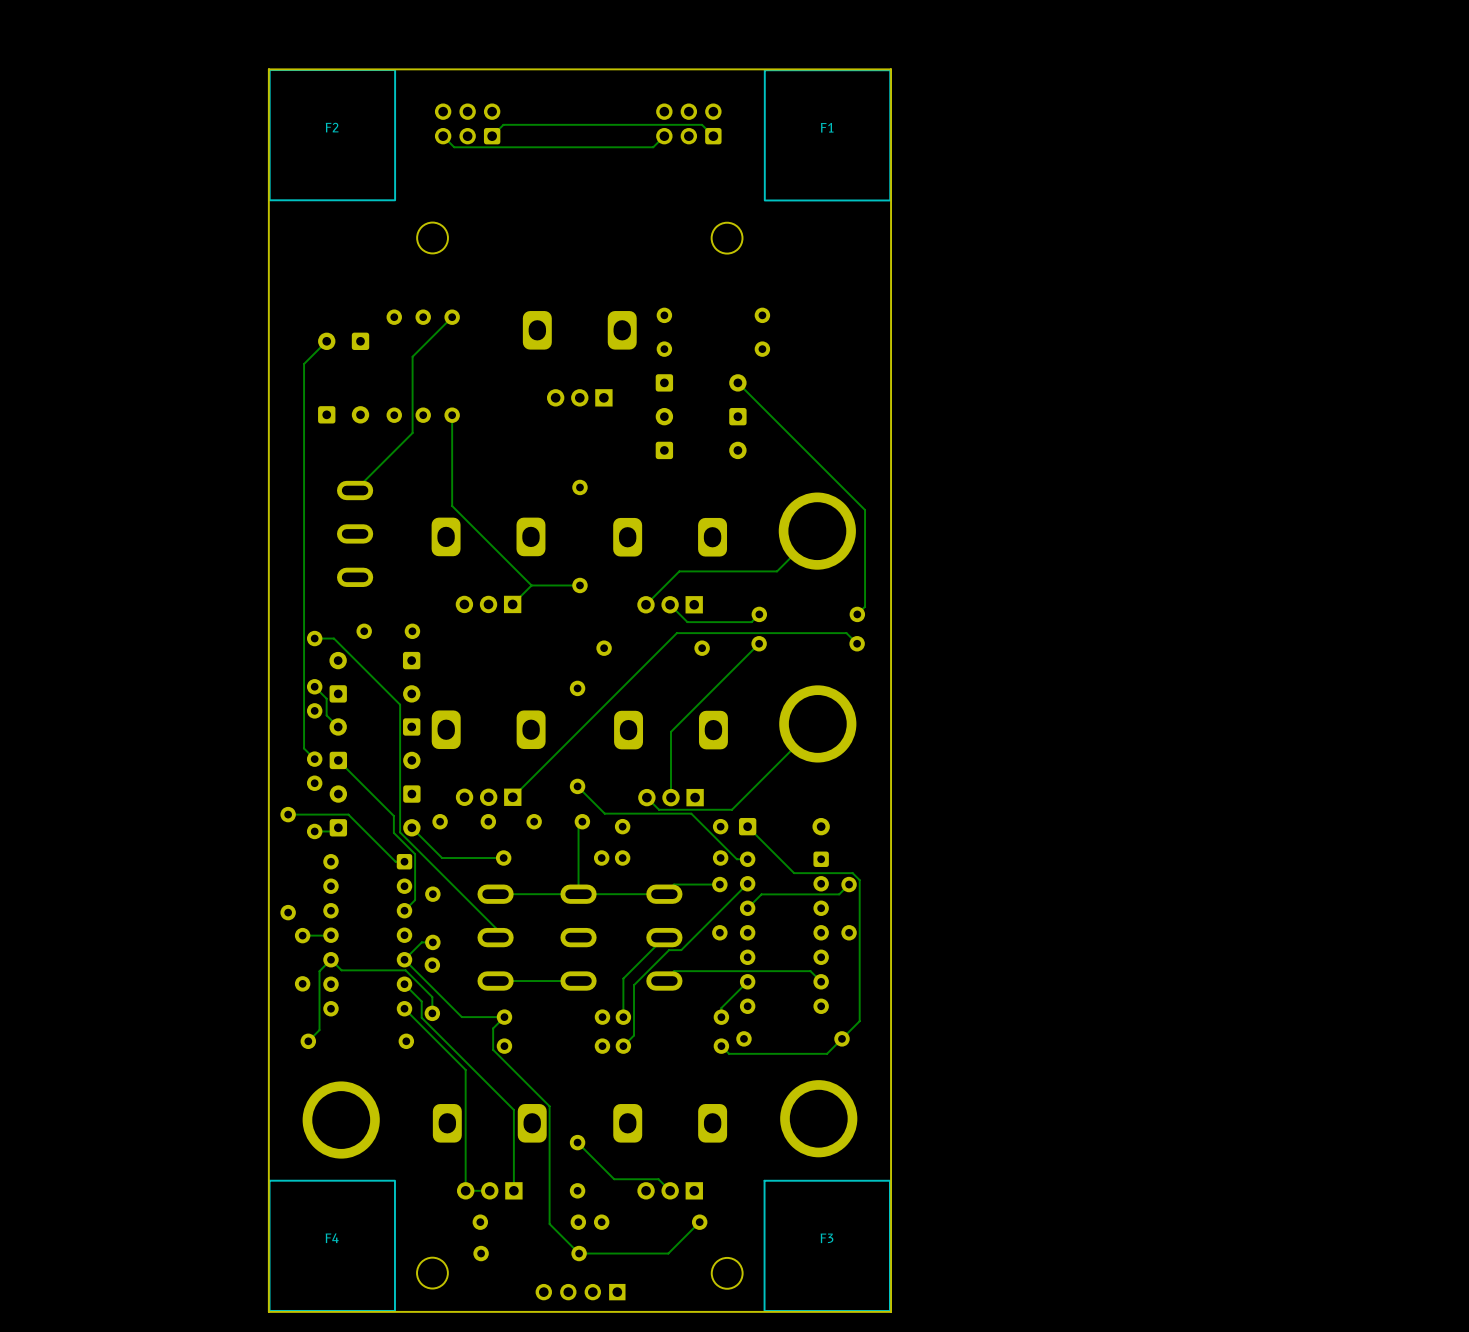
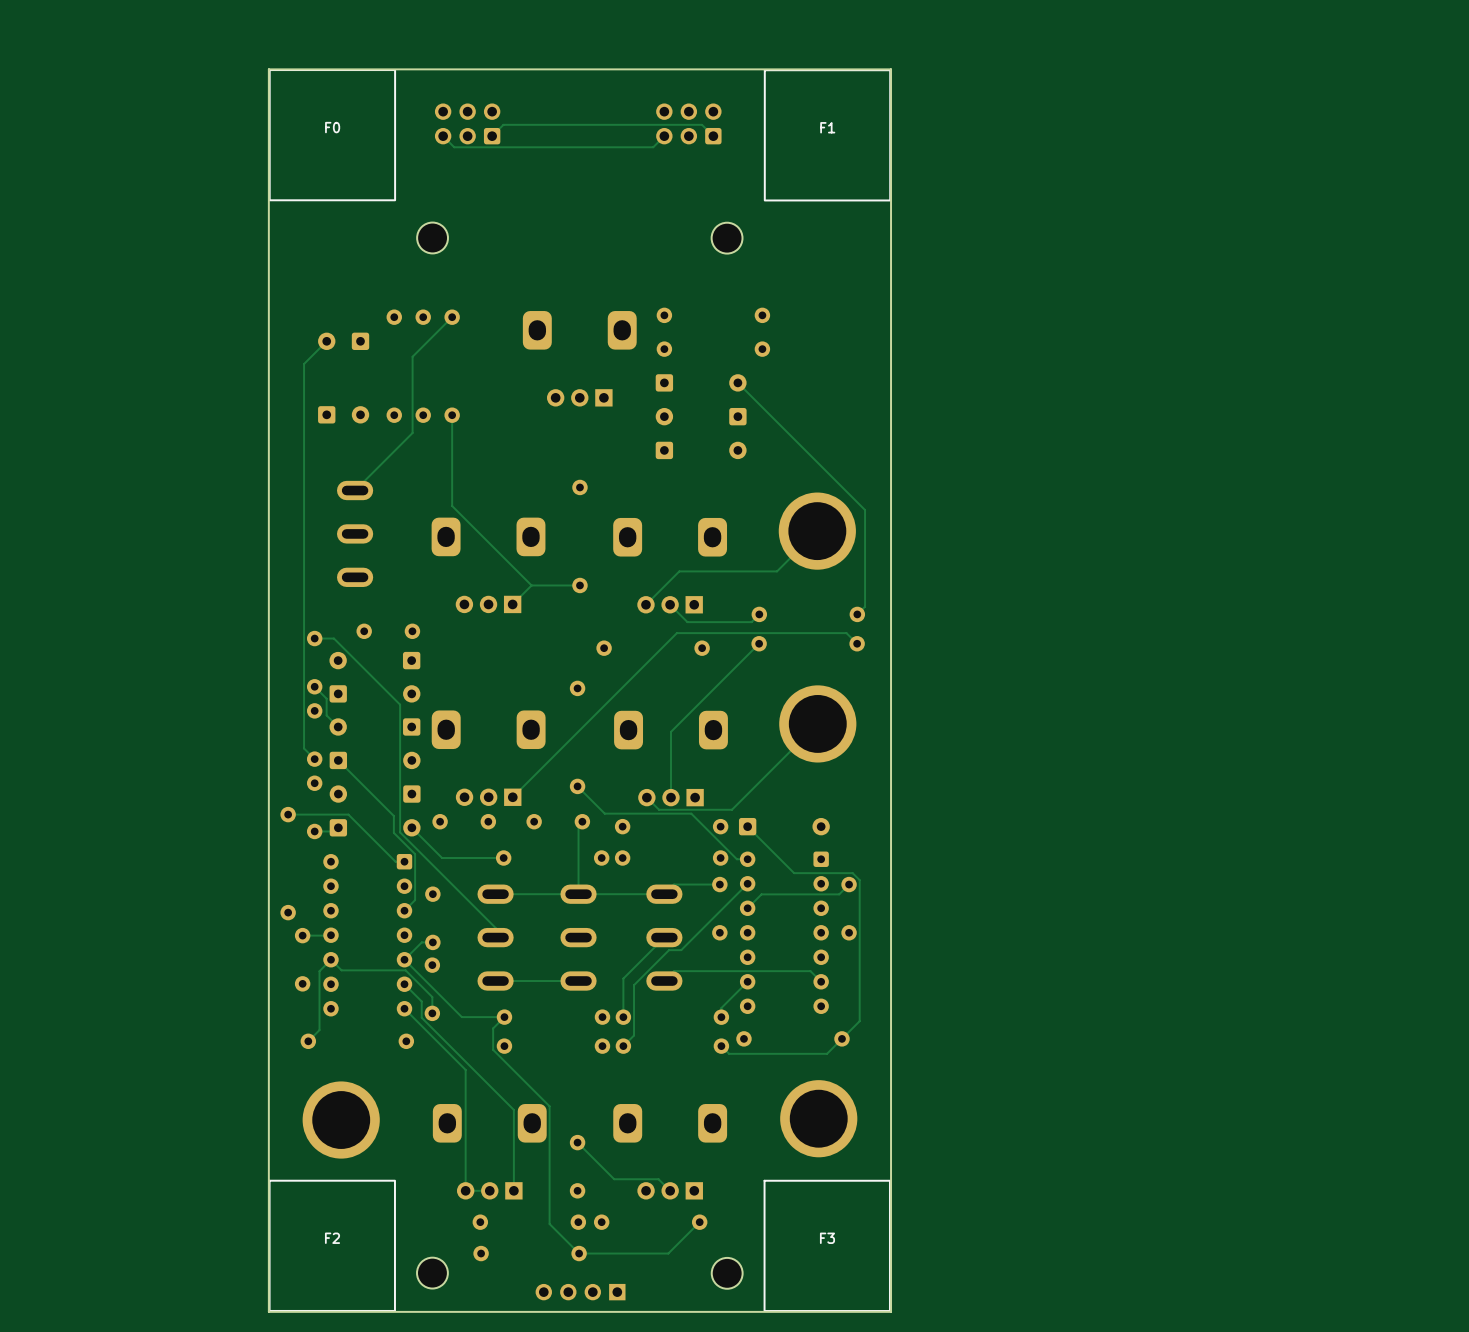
F2 name: F2 (332, 127) -> F0 (332, 127)
F4 name: F4 (332, 1238) -> F2 (332, 1238)

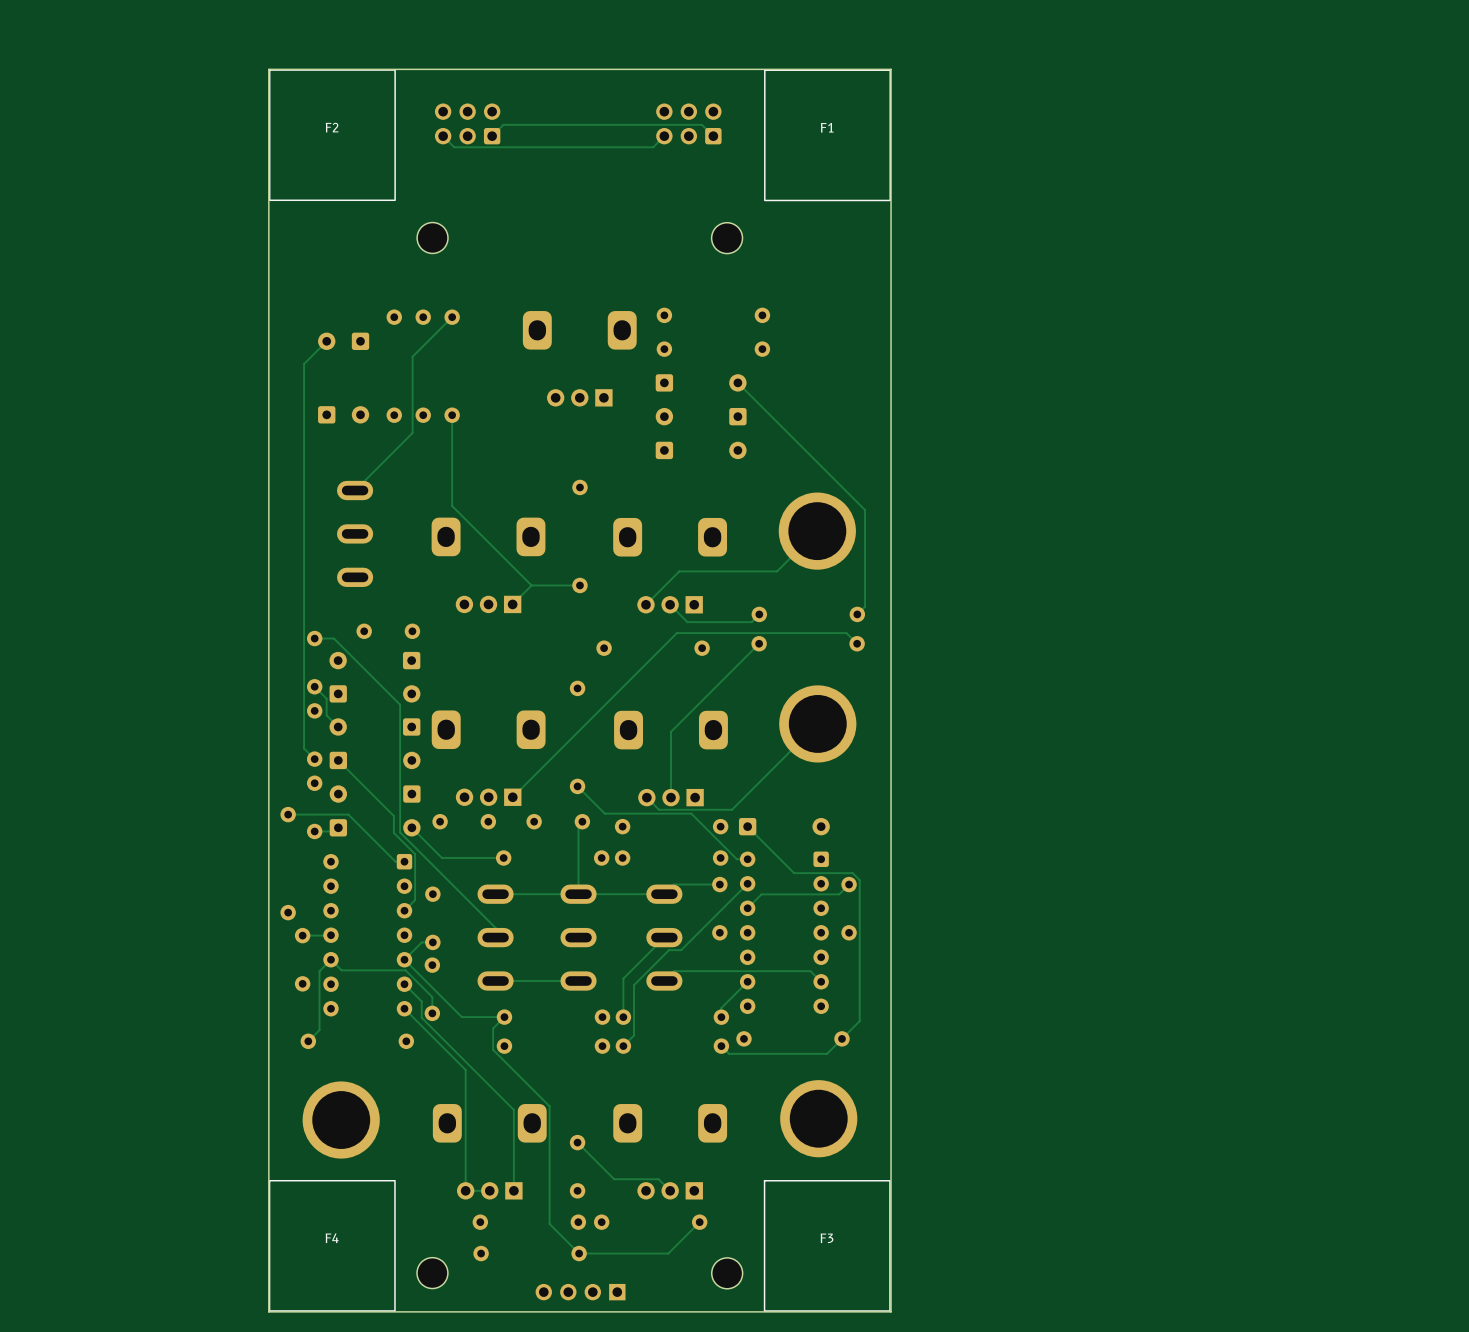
F0 name: F0 (332, 127) -> F2 (332, 127)
F2 name: F2 (332, 1238) -> F4 (332, 1238)

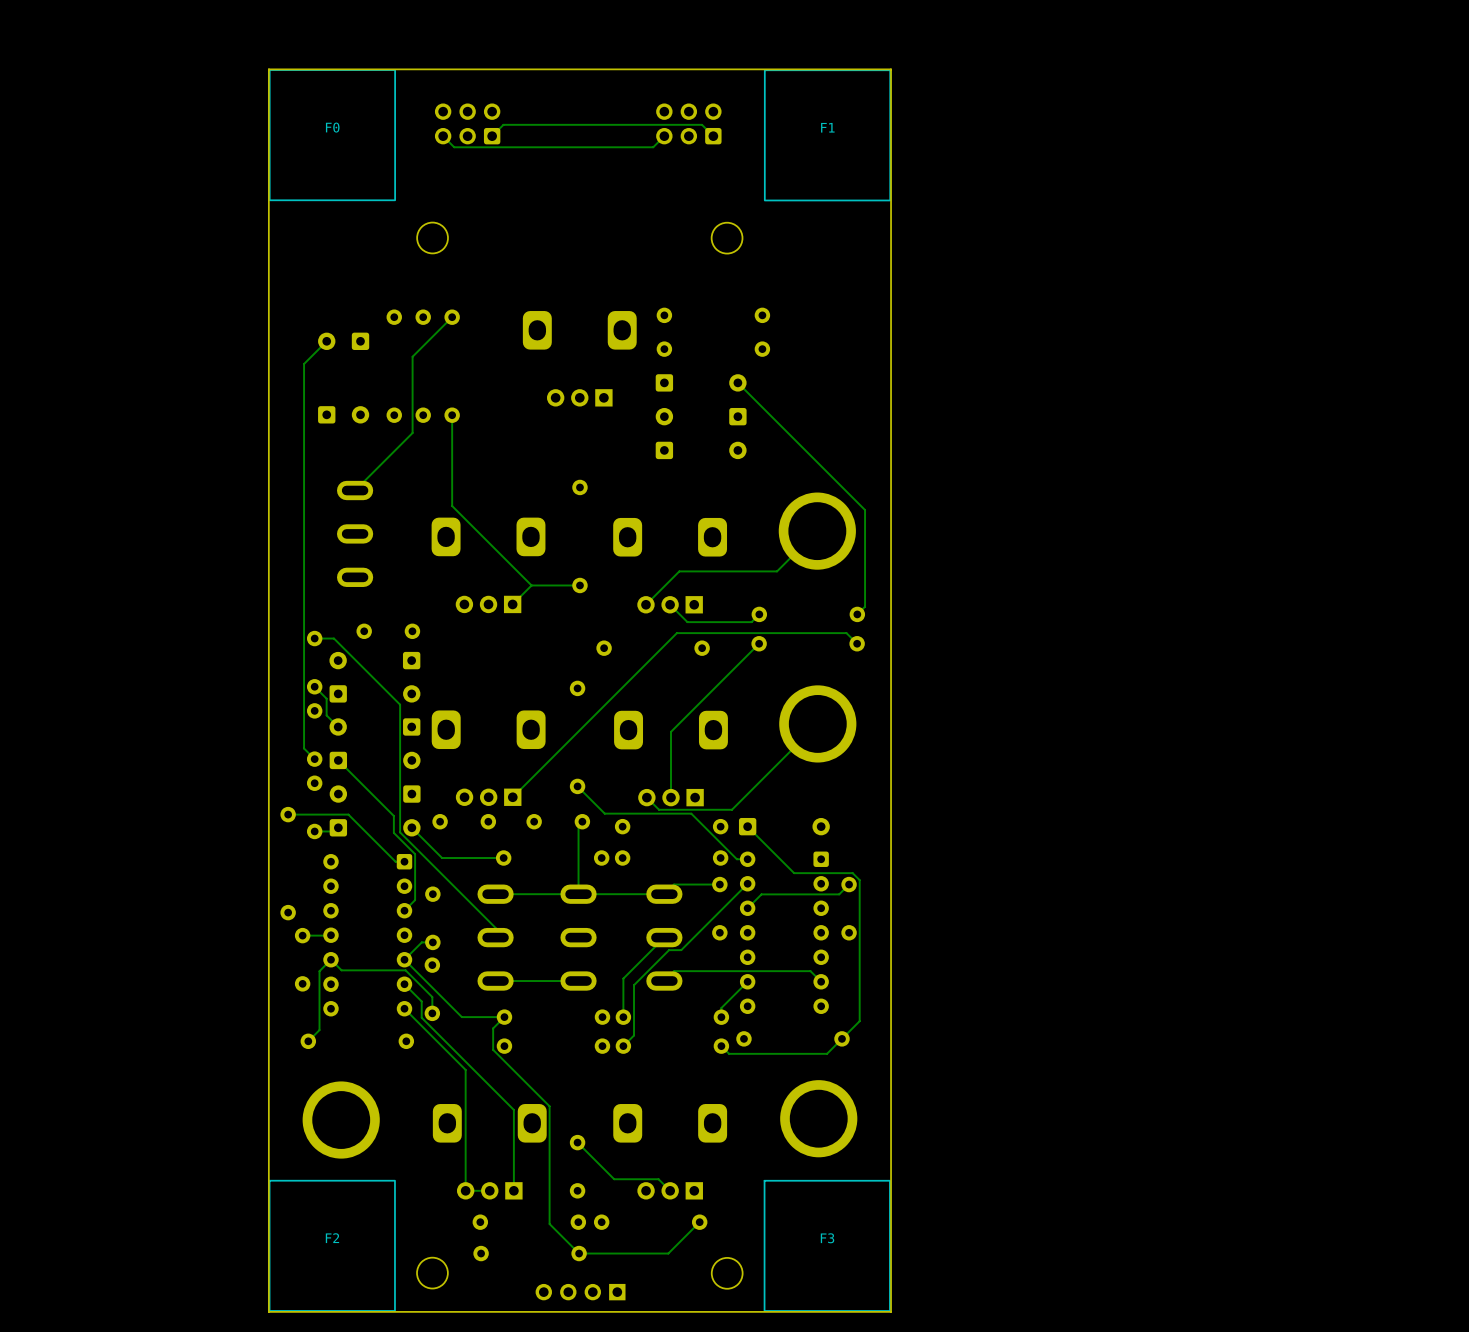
F2 name: F2 (332, 127) -> F0 (332, 127)
F4 name: F4 (332, 1238) -> F2 (332, 1238)

